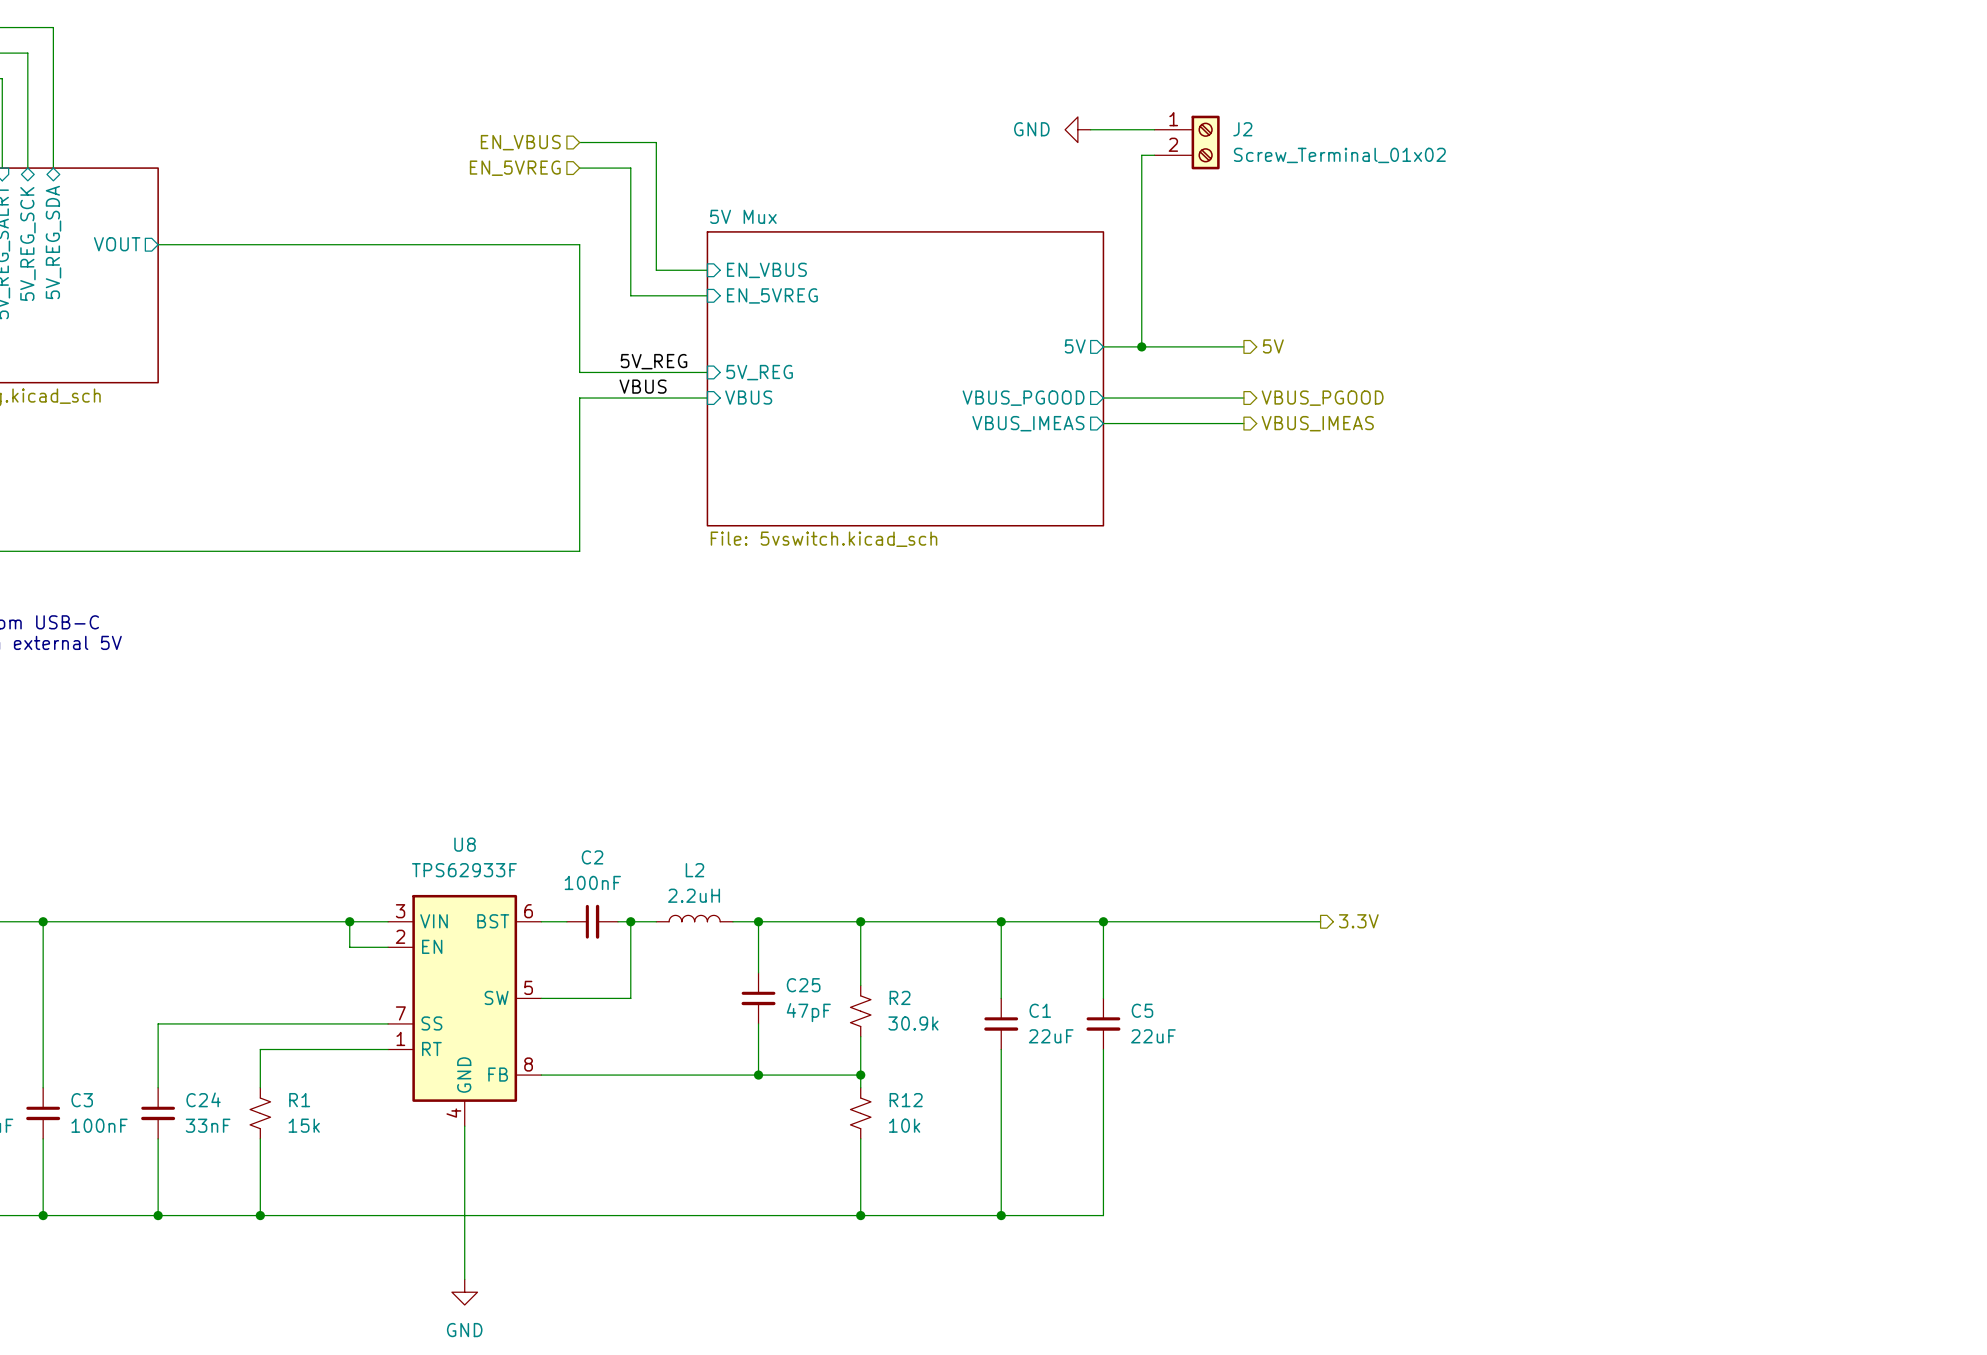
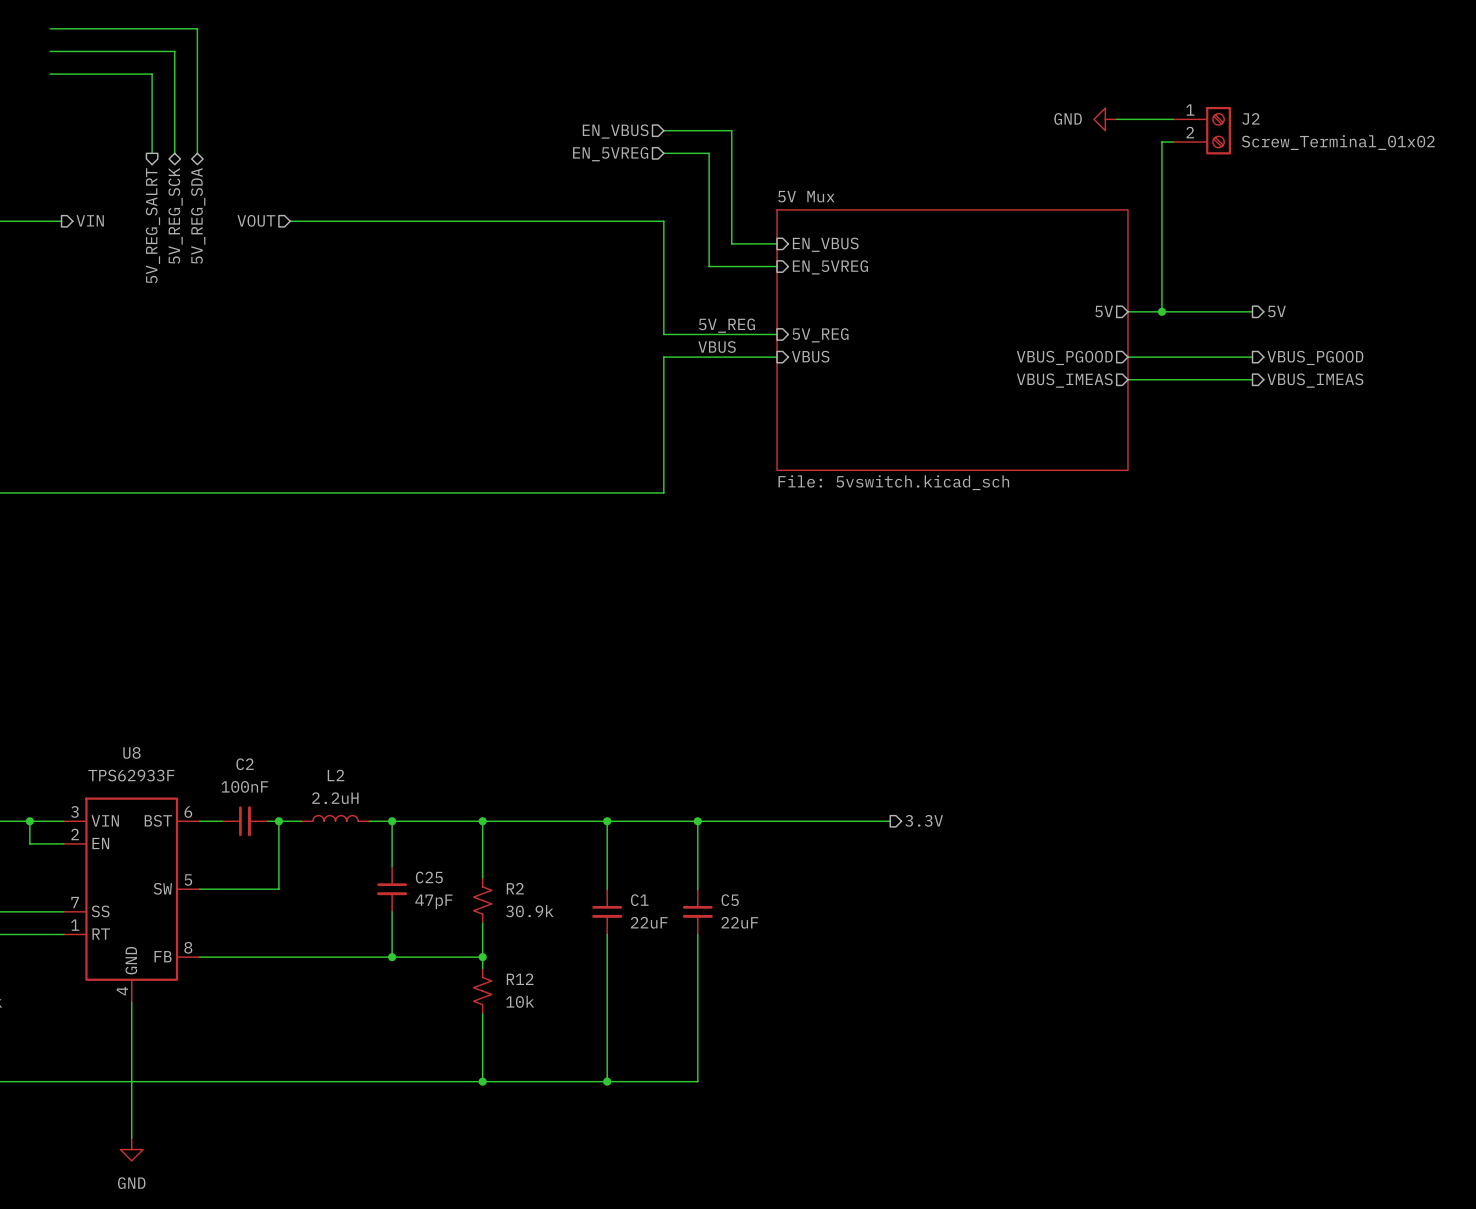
wire: none -> (50, 28) (197, 28) (197, 153)
wire: none -> (50, 51) (174, 51) (174, 153)
wire: none -> (50, 74) (152, 74) (152, 153)
power symbol: GND (1077, 129) -> none
wire: (1090, 129) (1154, 129) -> none
power symbol: none -> GND (1105, 119)
wire: none -> (1116, 119) (1173, 119)
hierarchical label: EN_VBUS (520, 142) -> none
wire: (579, 142) (656, 142) (656, 270) (707, 270) -> none
hierarchical label: none -> EN_VBUS (615, 131)
J2 position: (1187, 142) -> (1202, 130)
wire: (1141, 155) (1154, 155) -> (731, 142) (731, 130) (663, 130)
wire: none -> (1173, 142) (1161, 142) (1161, 311)
hierarchical label: EN_5VREG (515, 168) -> none
wire: (579, 168) (630, 168) (630, 295) (707, 295) -> none
hierarchical label: none -> EN_5VREG (610, 154)
wire: none -> (663, 153) (709, 153) (709, 266) (777, 266)
sheet pin: none -> 5V_REG_SDA (198, 216)
wire: (385, 244) (579, 244) (579, 372) (707, 372) -> none
sheet pin: none -> VIN (90, 220)
sheet pin: none -> 5V_REG_SCK (175, 215)
sheet pin: none -> VOUT (256, 220)
wire: none -> (290, 221) (663, 221) (663, 334) (777, 334)
sheet pin: none -> 5V_REG_SALRT (152, 225)
sheet pin: EN_VBUS (766, 270) -> none
wire: (1141, 270) (1141, 346) -> (731, 243) (777, 243)
sheet pin: none -> EN_VBUS (825, 244)
sheet pin: EN_5VREG (772, 295) -> none
sheet pin: none -> EN_5VREG (830, 267)
sheet pin: 5V (1075, 346) -> none
wire: (1103, 346) (1243, 346) -> none
junction: (1141, 346) -> none
hierarchical label: 5V (1273, 346) -> none
sheet pin: none -> 5V (1104, 311)
wire: none -> (1127, 311) (1252, 311)
junction: none -> (1161, 311)
hierarchical label: none -> 5V (1276, 311)
label: 5V_REG (653, 361) -> none
label: none -> 5V_REG (726, 325)
sheet pin: 5V_REG (759, 372) -> none
sheet pin: none -> 5V_REG (820, 335)
sheet 5V Mux position: (905, 378) -> (952, 340)
label: VBUS (643, 386) -> none
label: none -> VBUS (717, 347)
sheet pin: VBUS (748, 397) -> none
sheet pin: none -> VBUS (810, 356)
wire: (707, 398) (579, 398) (579, 551) -> (697, 357) (663, 357) (663, 492) (233, 492)
sheet pin: VBUS_PGOOD (1023, 398) -> none
wire: (1192, 398) (1243, 398) -> none
hierarchical label: VBUS_PGOOD (1322, 398) -> none
sheet pin: none -> VBUS_PGOOD (1064, 357)
wire: none -> (1127, 357) (1252, 357)
hierarchical label: none -> VBUS_PGOOD (1315, 357)
sheet pin: VBUS_IMEAS (1028, 423) -> none
wire: (1103, 423) (1243, 423) -> none
hierarchical label: VBUS_IMEAS (1317, 423) -> none
sheet pin: none -> VBUS_IMEAS (1064, 380)
wire: none -> (1127, 379) (1252, 379)
hierarchical label: none -> VBUS_IMEAS (1315, 380)

